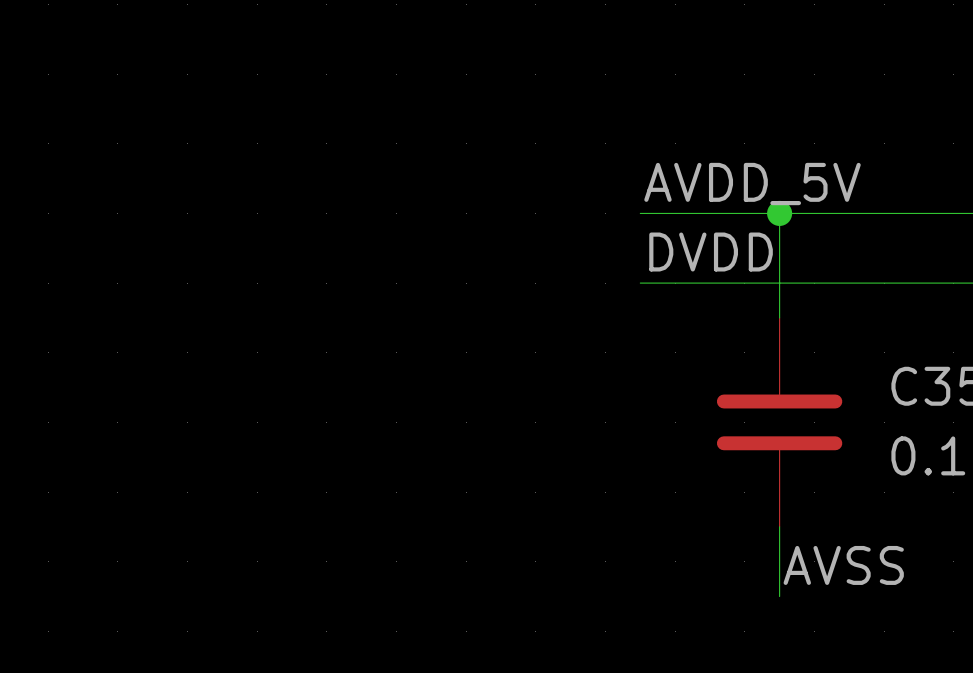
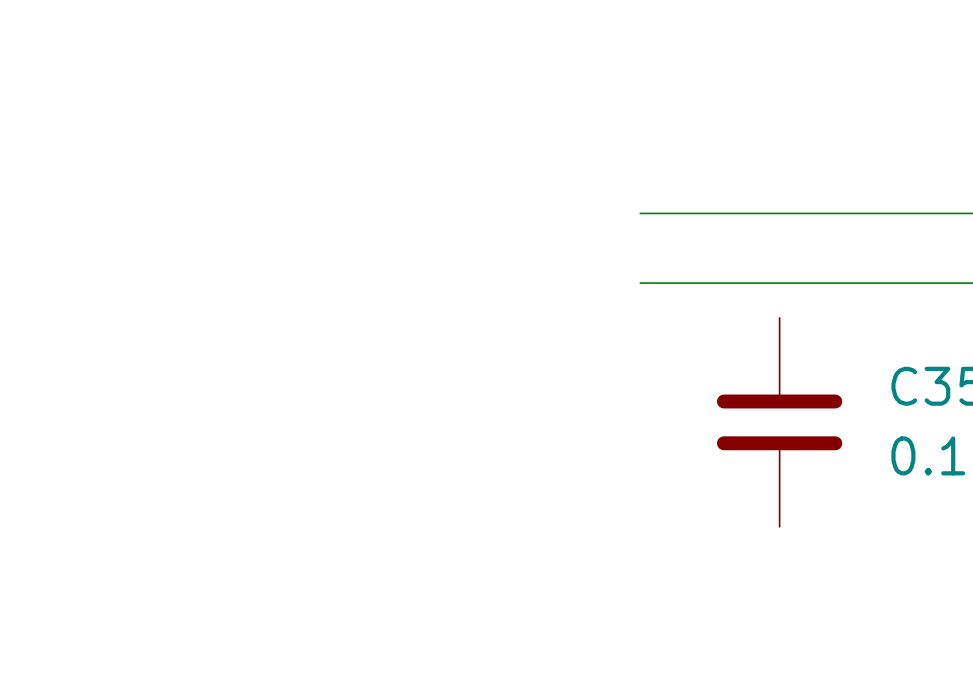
label: AVDD_5V (752, 184) -> none
wire: (779, 213) (779, 317) -> none
junction: (779, 213) -> none
label: DVDD (711, 252) -> none
wire: (779, 526) (779, 596) -> none
label: AVSS (843, 565) -> none

